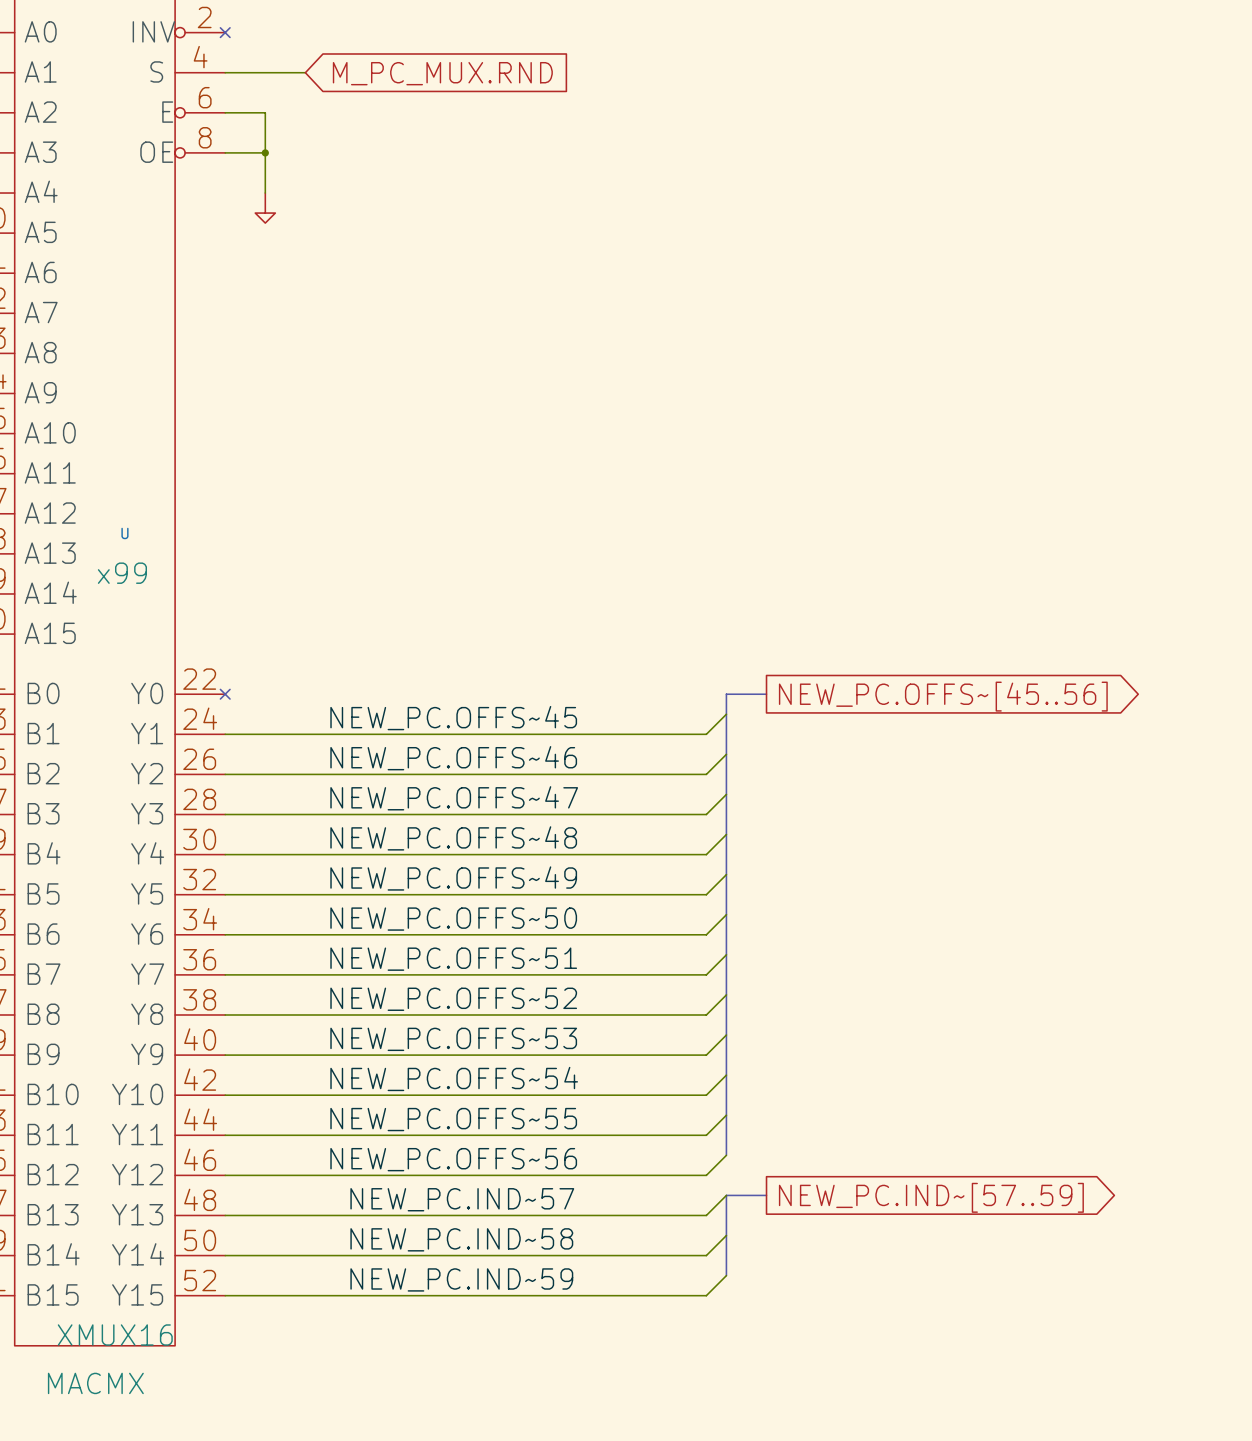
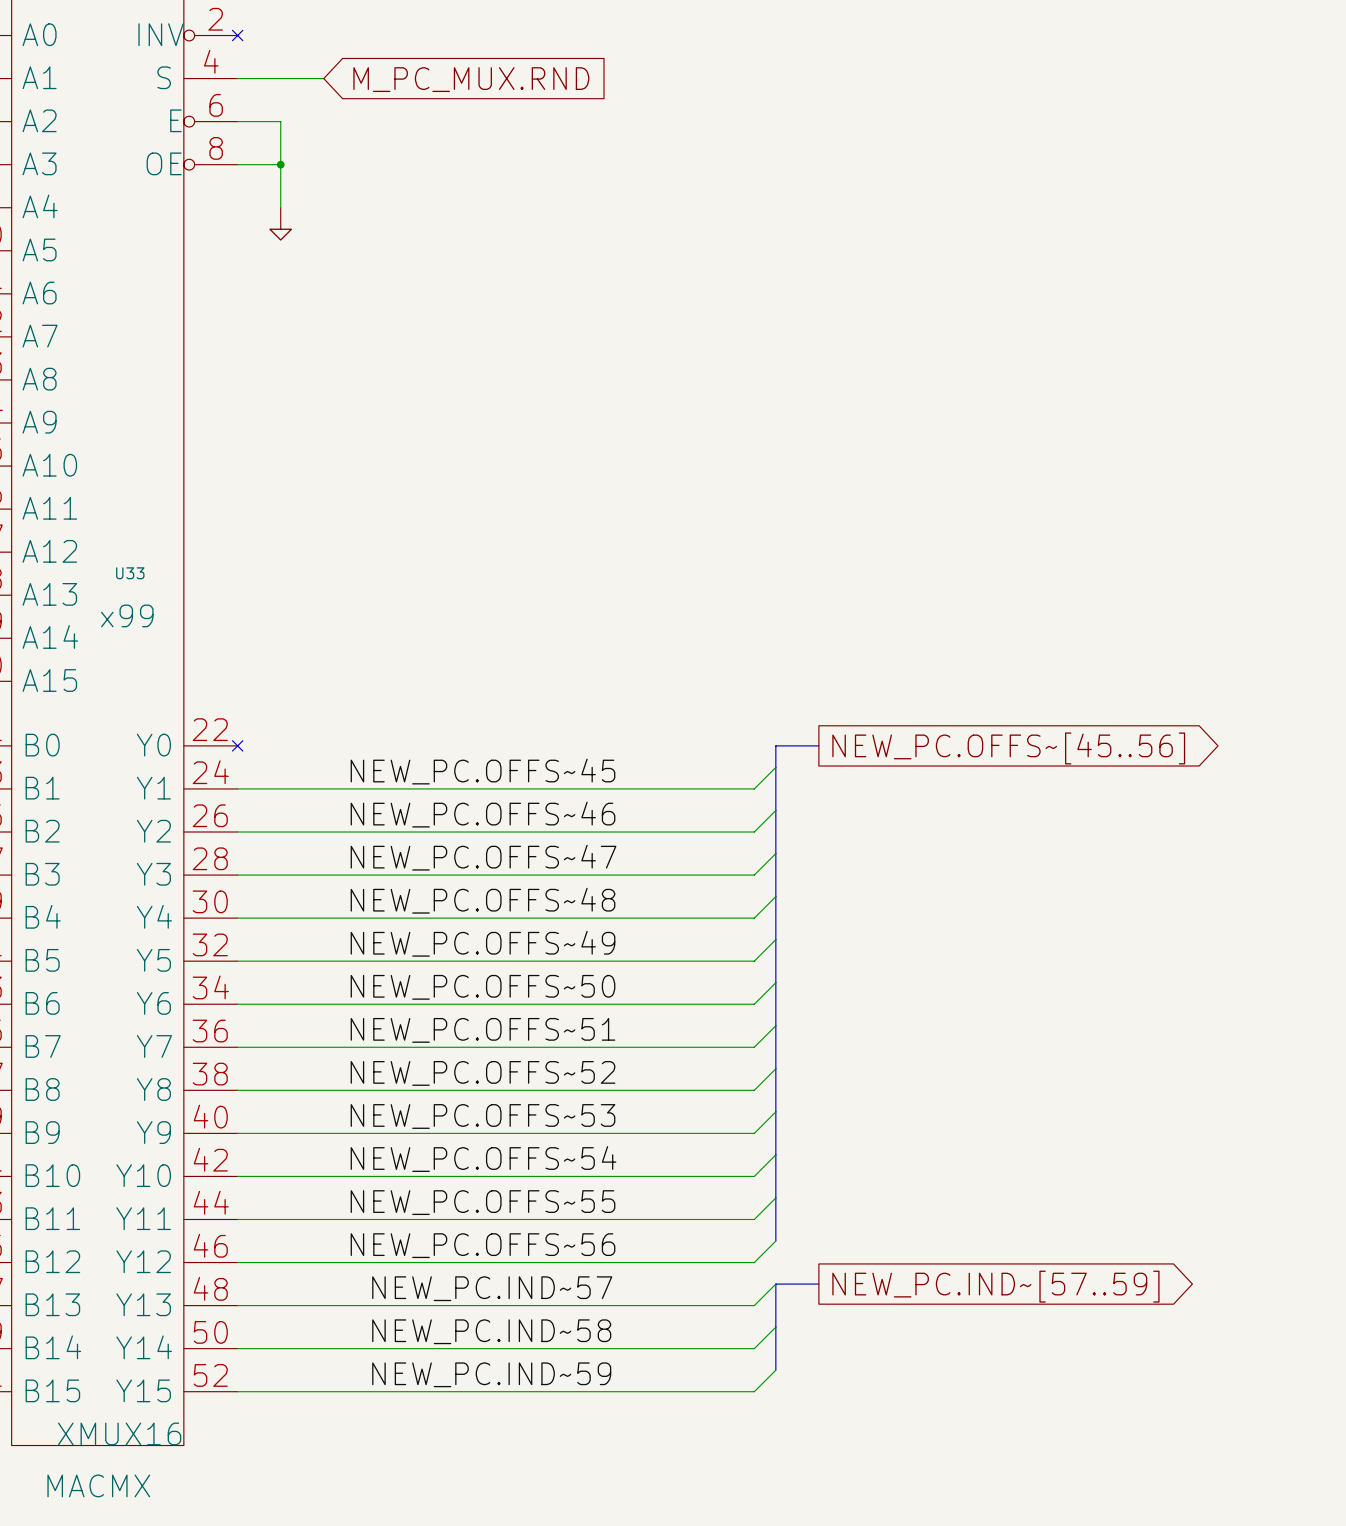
U name: U (124, 533) -> U33 (130, 573)

